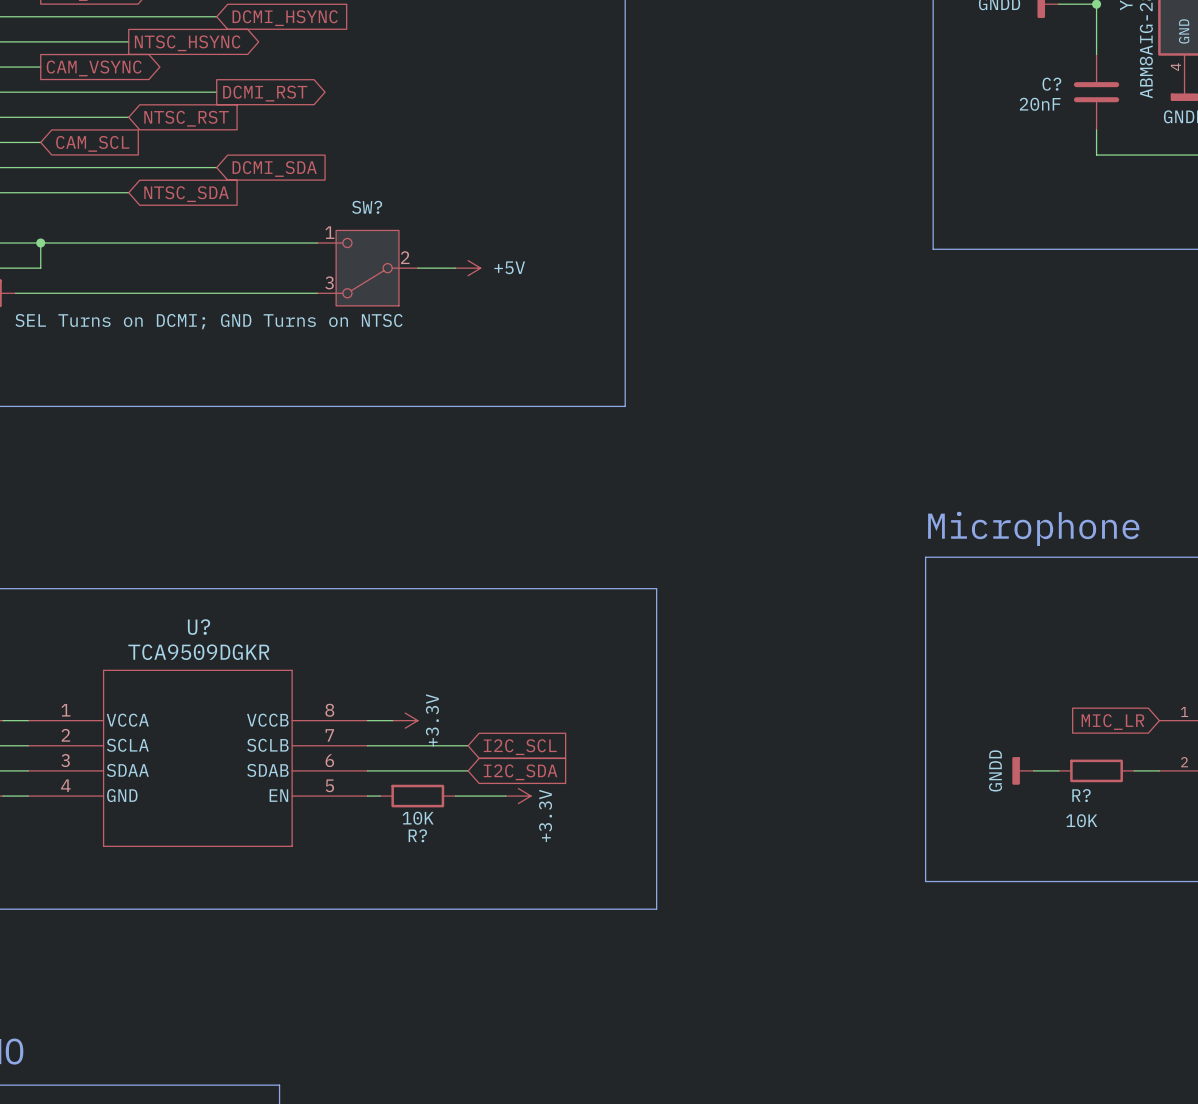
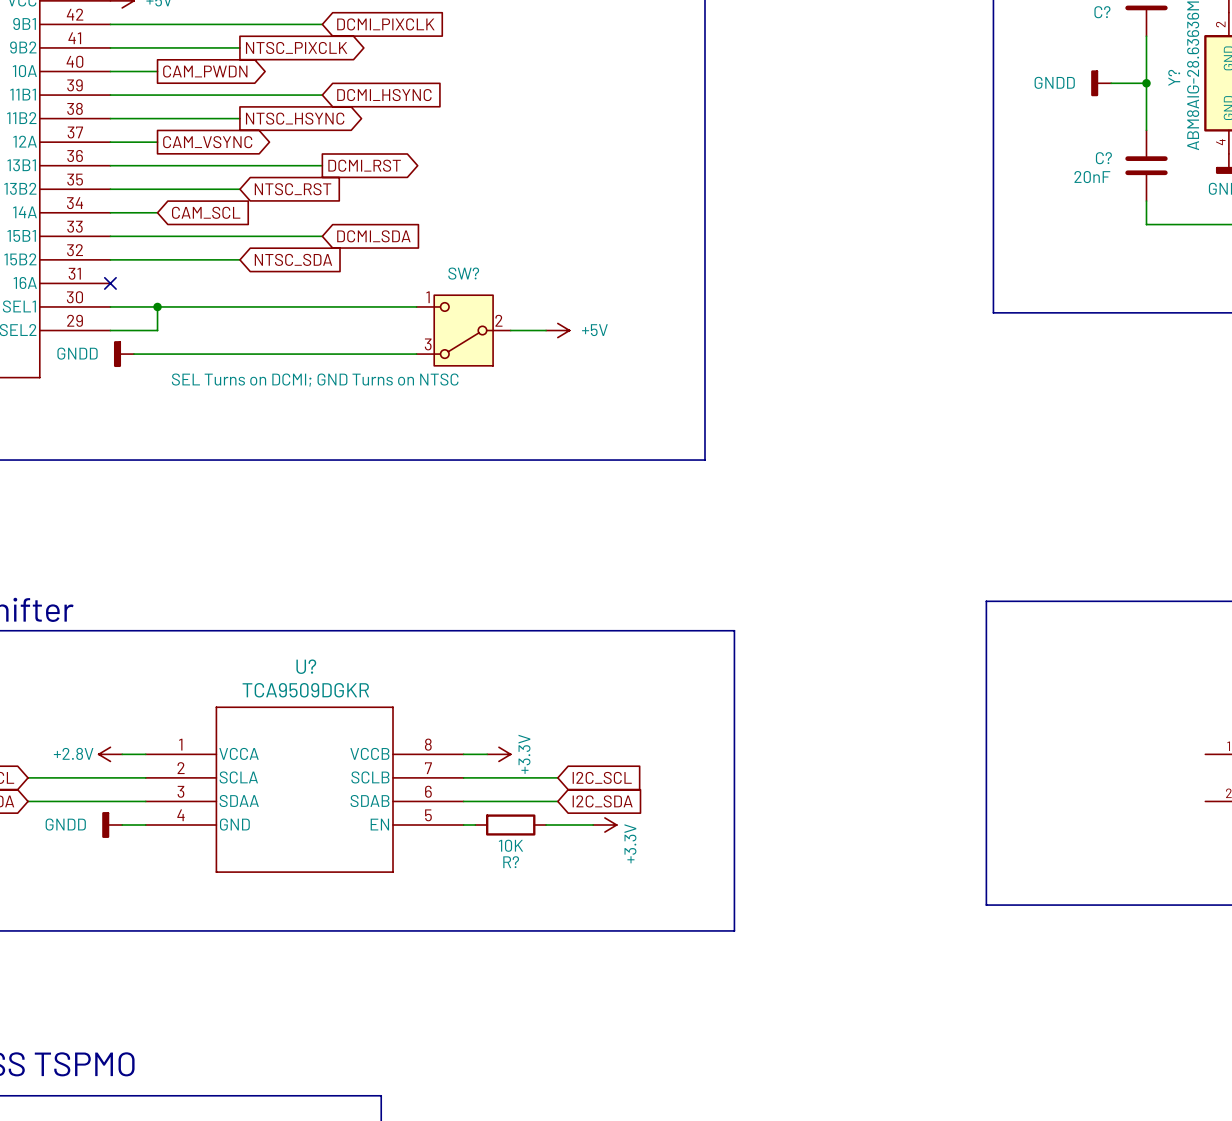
text: Microphone (1033, 528) -> none
global label: MIC_LR (1113, 722) -> none
power symbol: GNDD (1023, 770) -> none
wire: (1033, 770) (1058, 770) -> none
R?: 10K (1096, 770) -> none
wire: (1134, 770) (1159, 770) -> none

